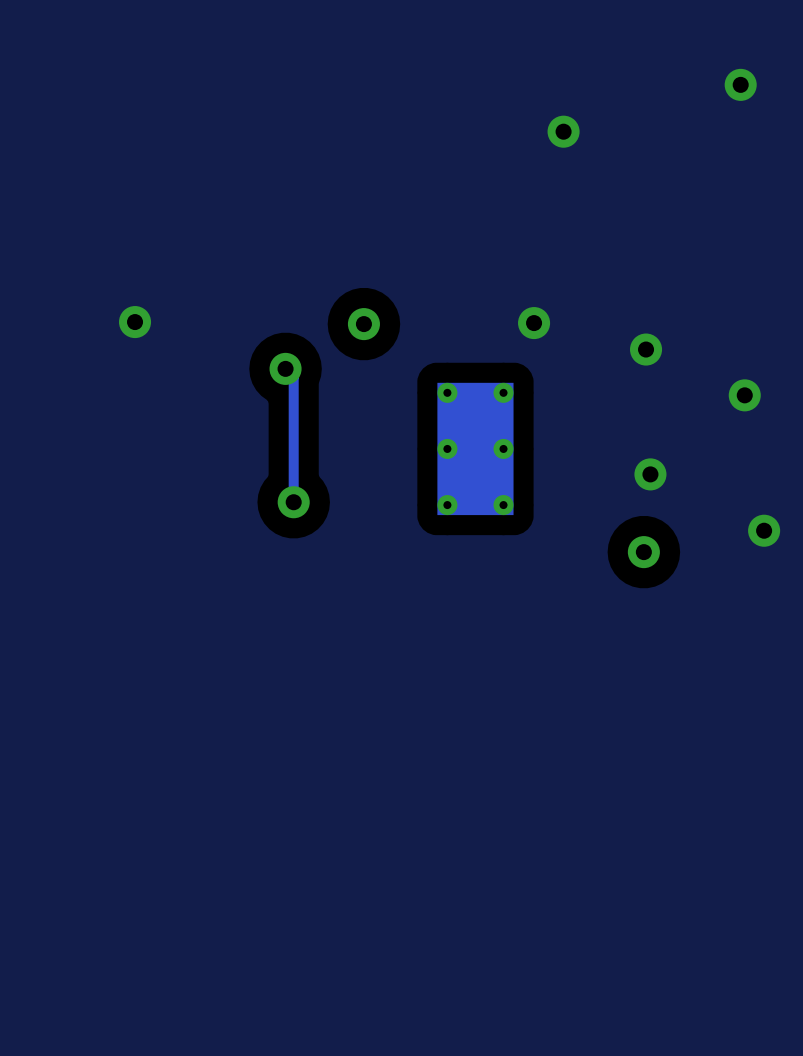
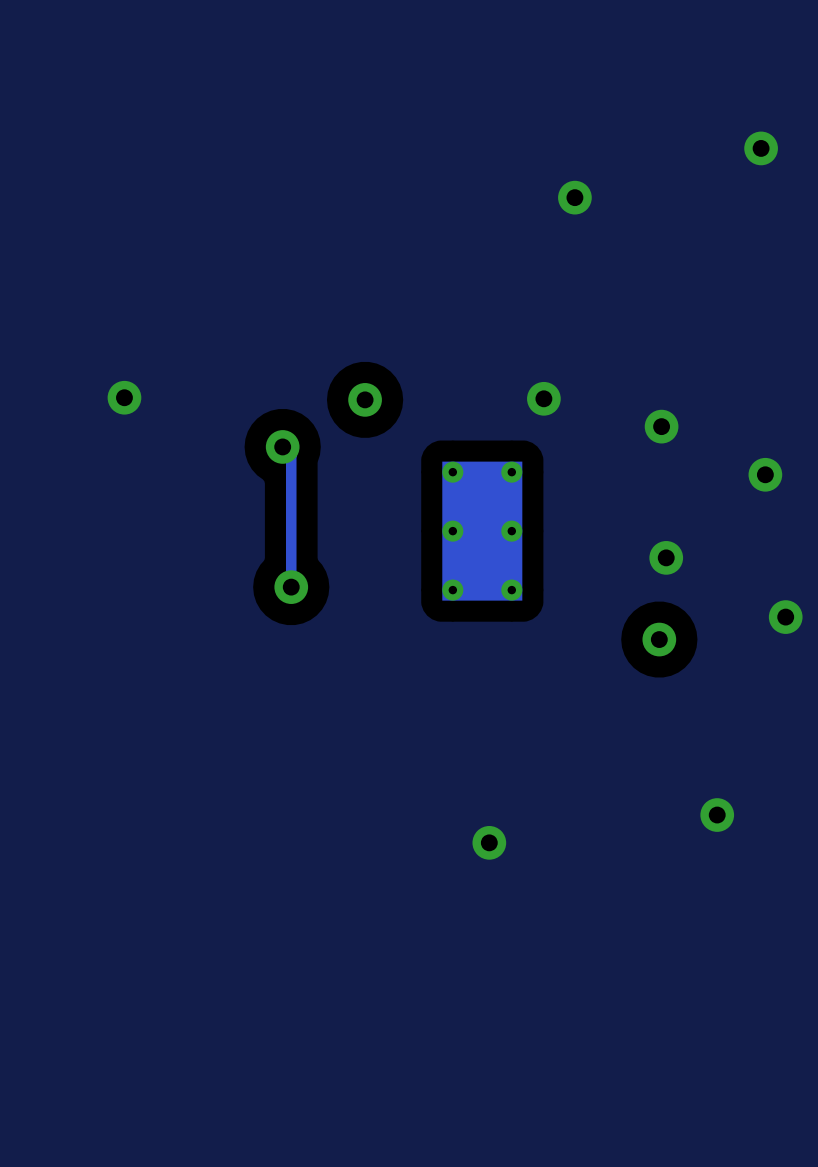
via: none -> (717, 815)
via: none -> (489, 842)

